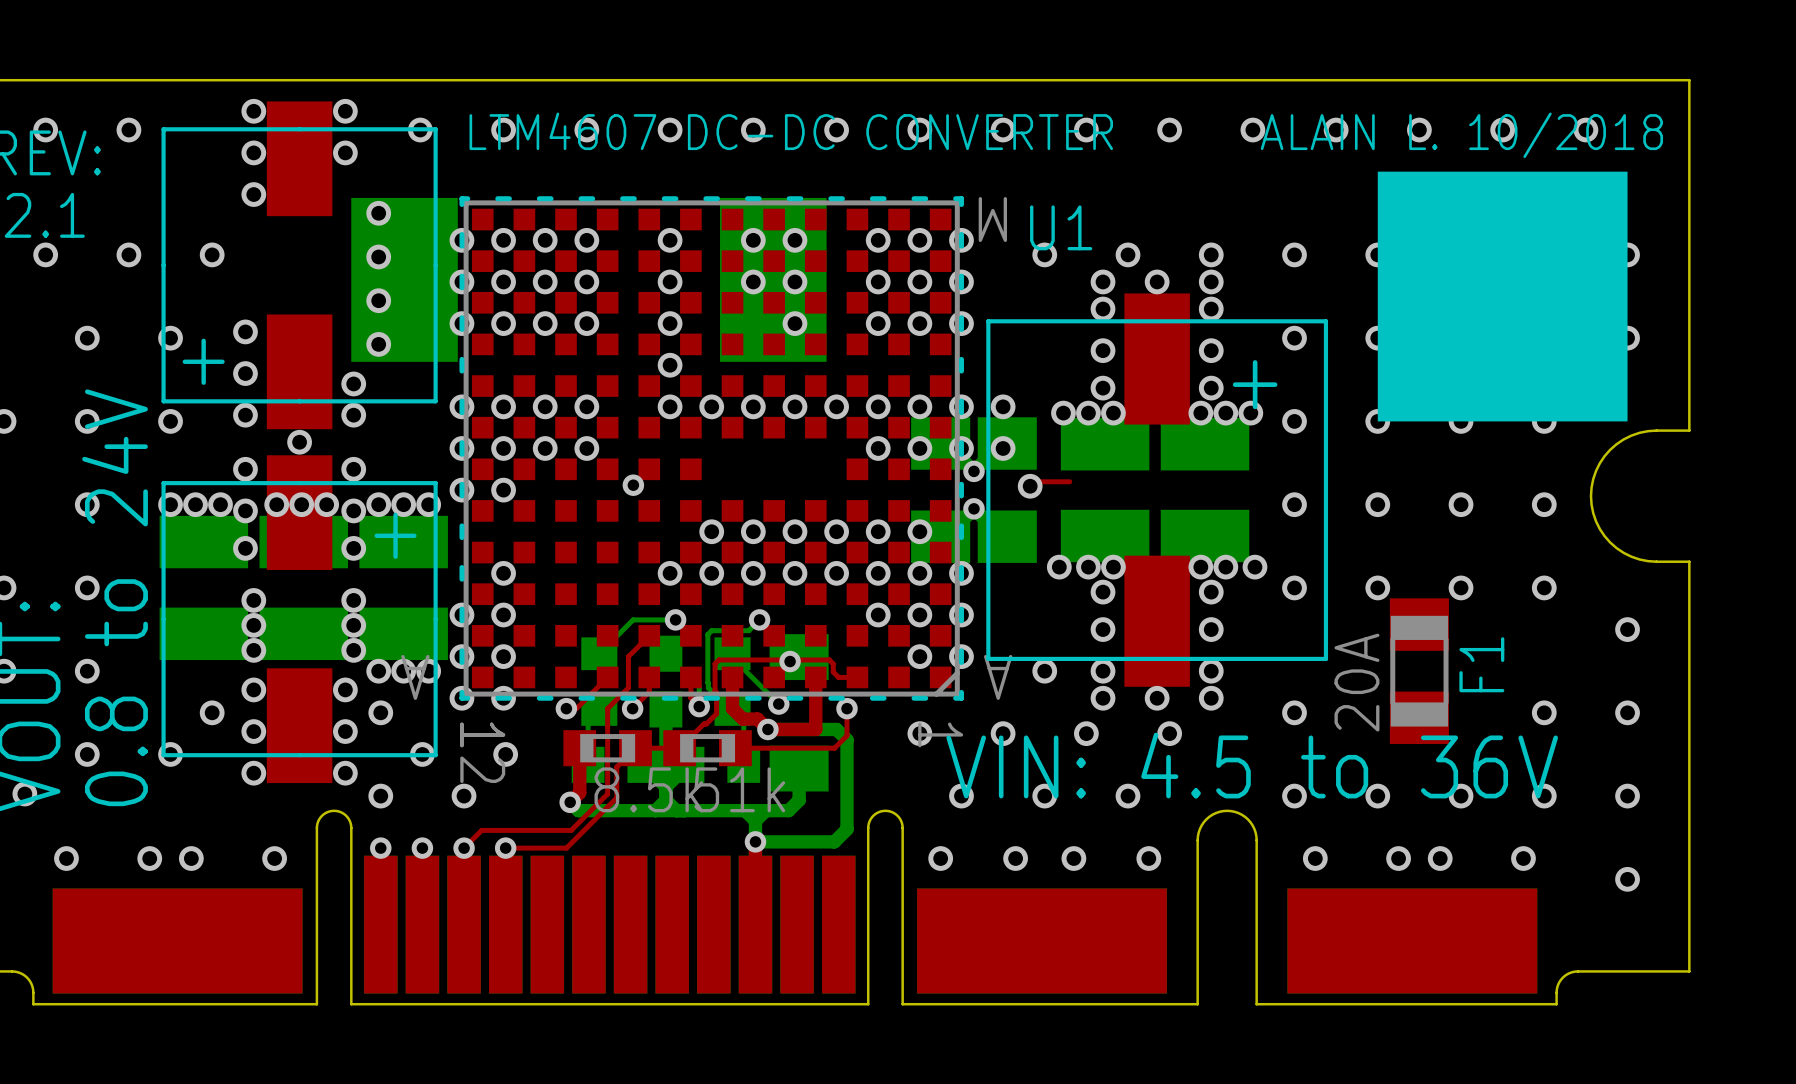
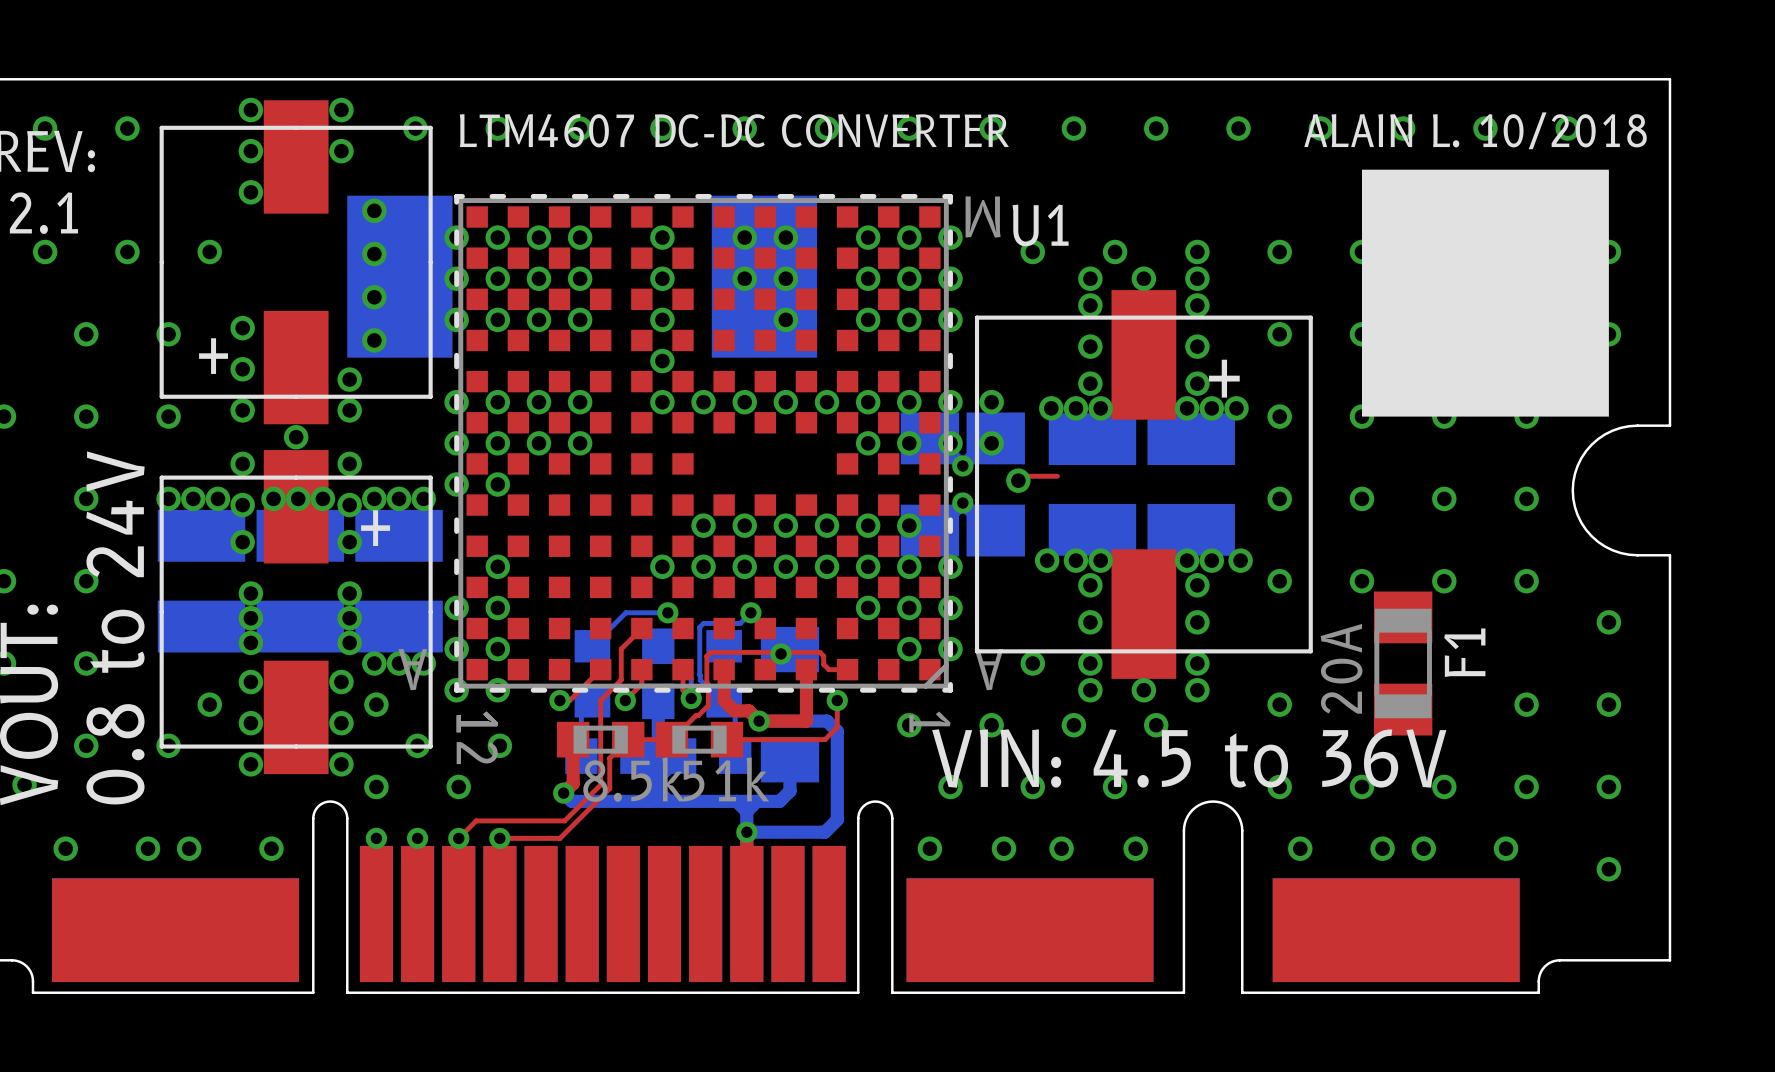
via: (633, 485) -> none
bottom track: (732, 653) (732, 657) (778, 704) -> none
via: (778, 704) -> none

